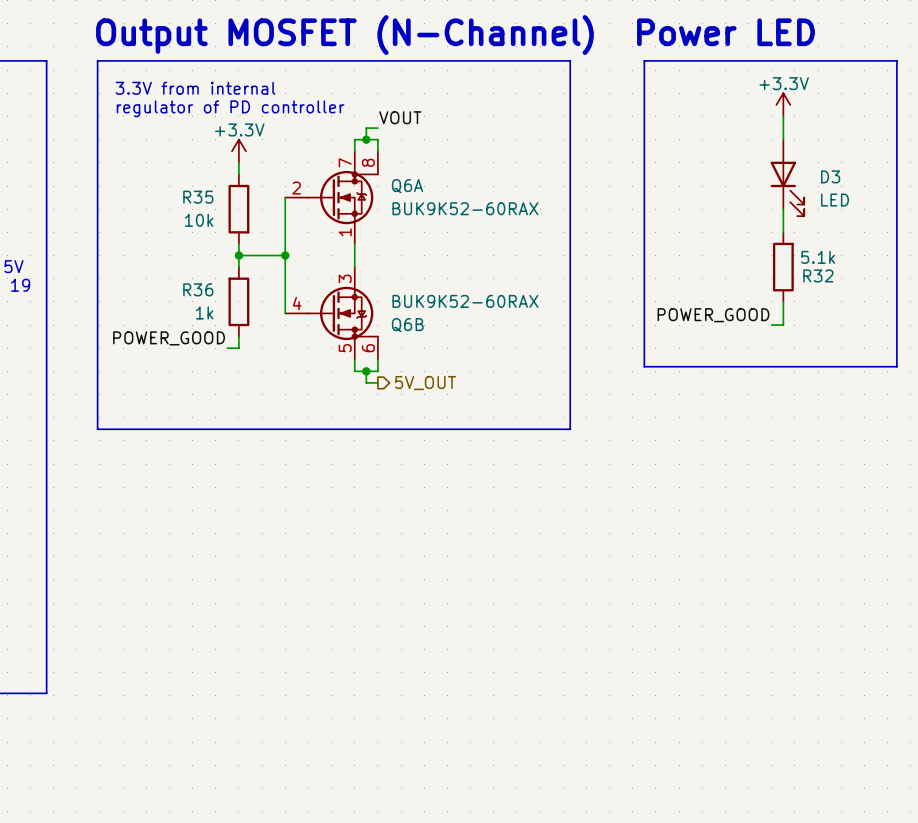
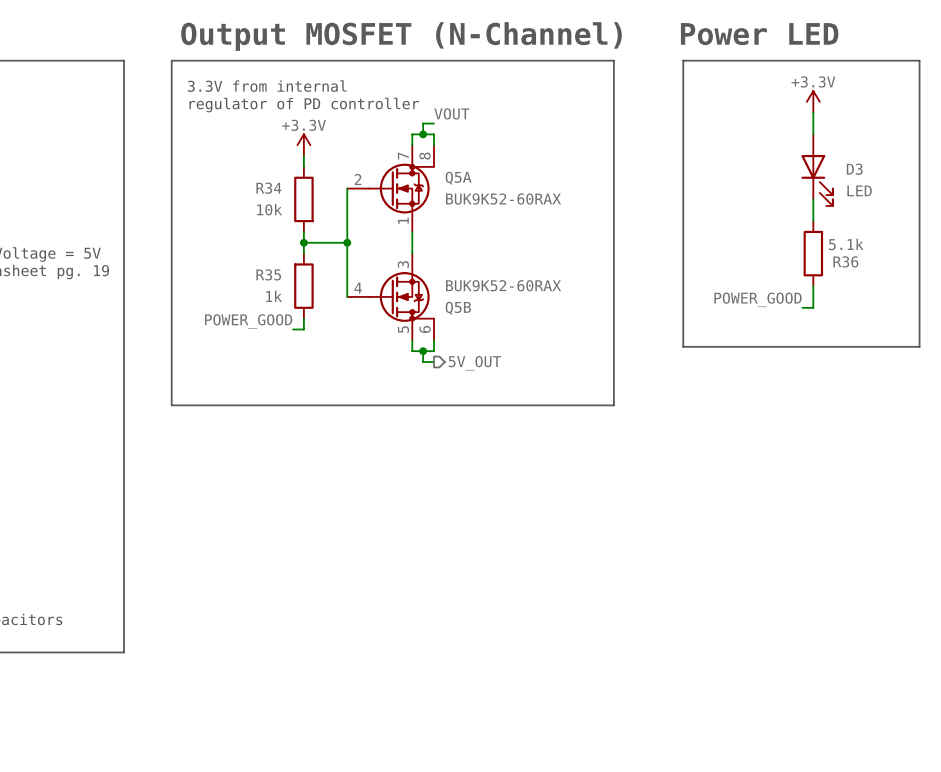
Q6A name: Q6A (407, 186) -> Q5A (458, 178)
R35 name: R35 (198, 197) -> R34 (268, 188)
R32 name: R32 (818, 275) -> R36 (845, 261)
R36 name: R36 (198, 289) -> R35 (268, 274)
Q6B name: Q6B (407, 325) -> Q5B (458, 308)

